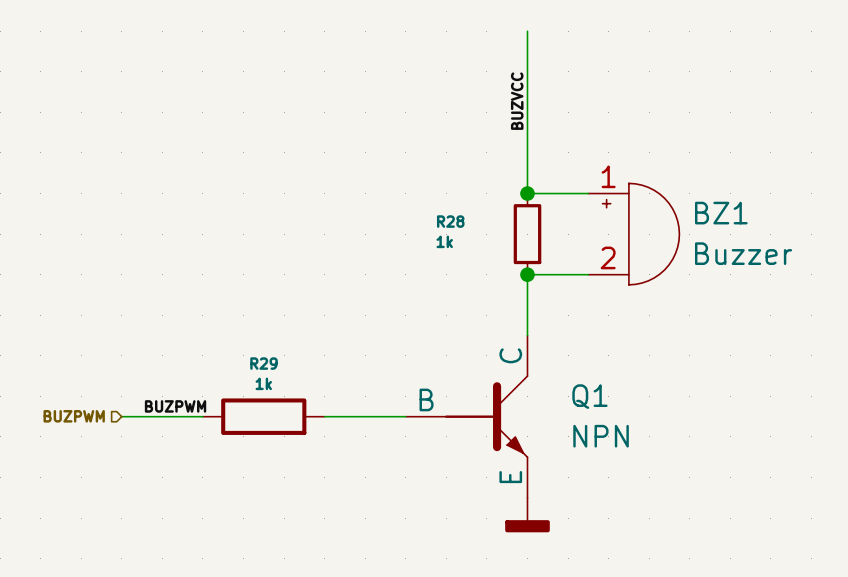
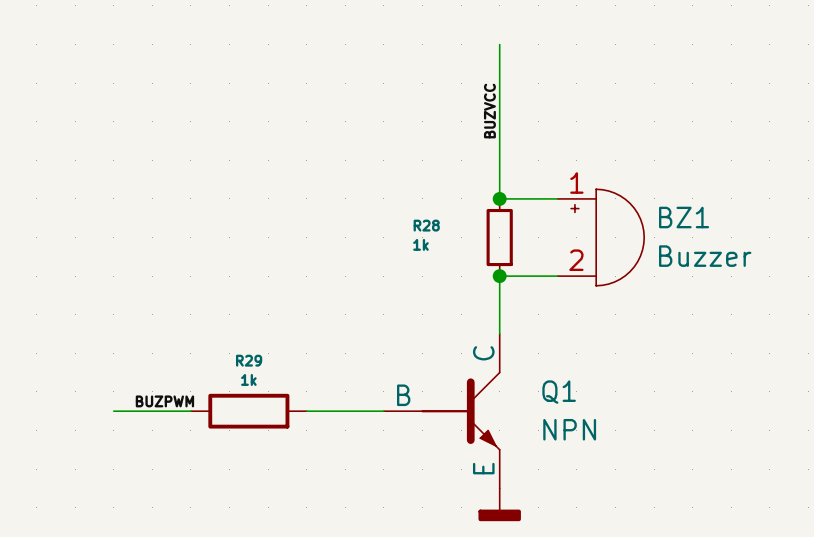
hierarchical label: BUZPWM (74, 416) -> none

